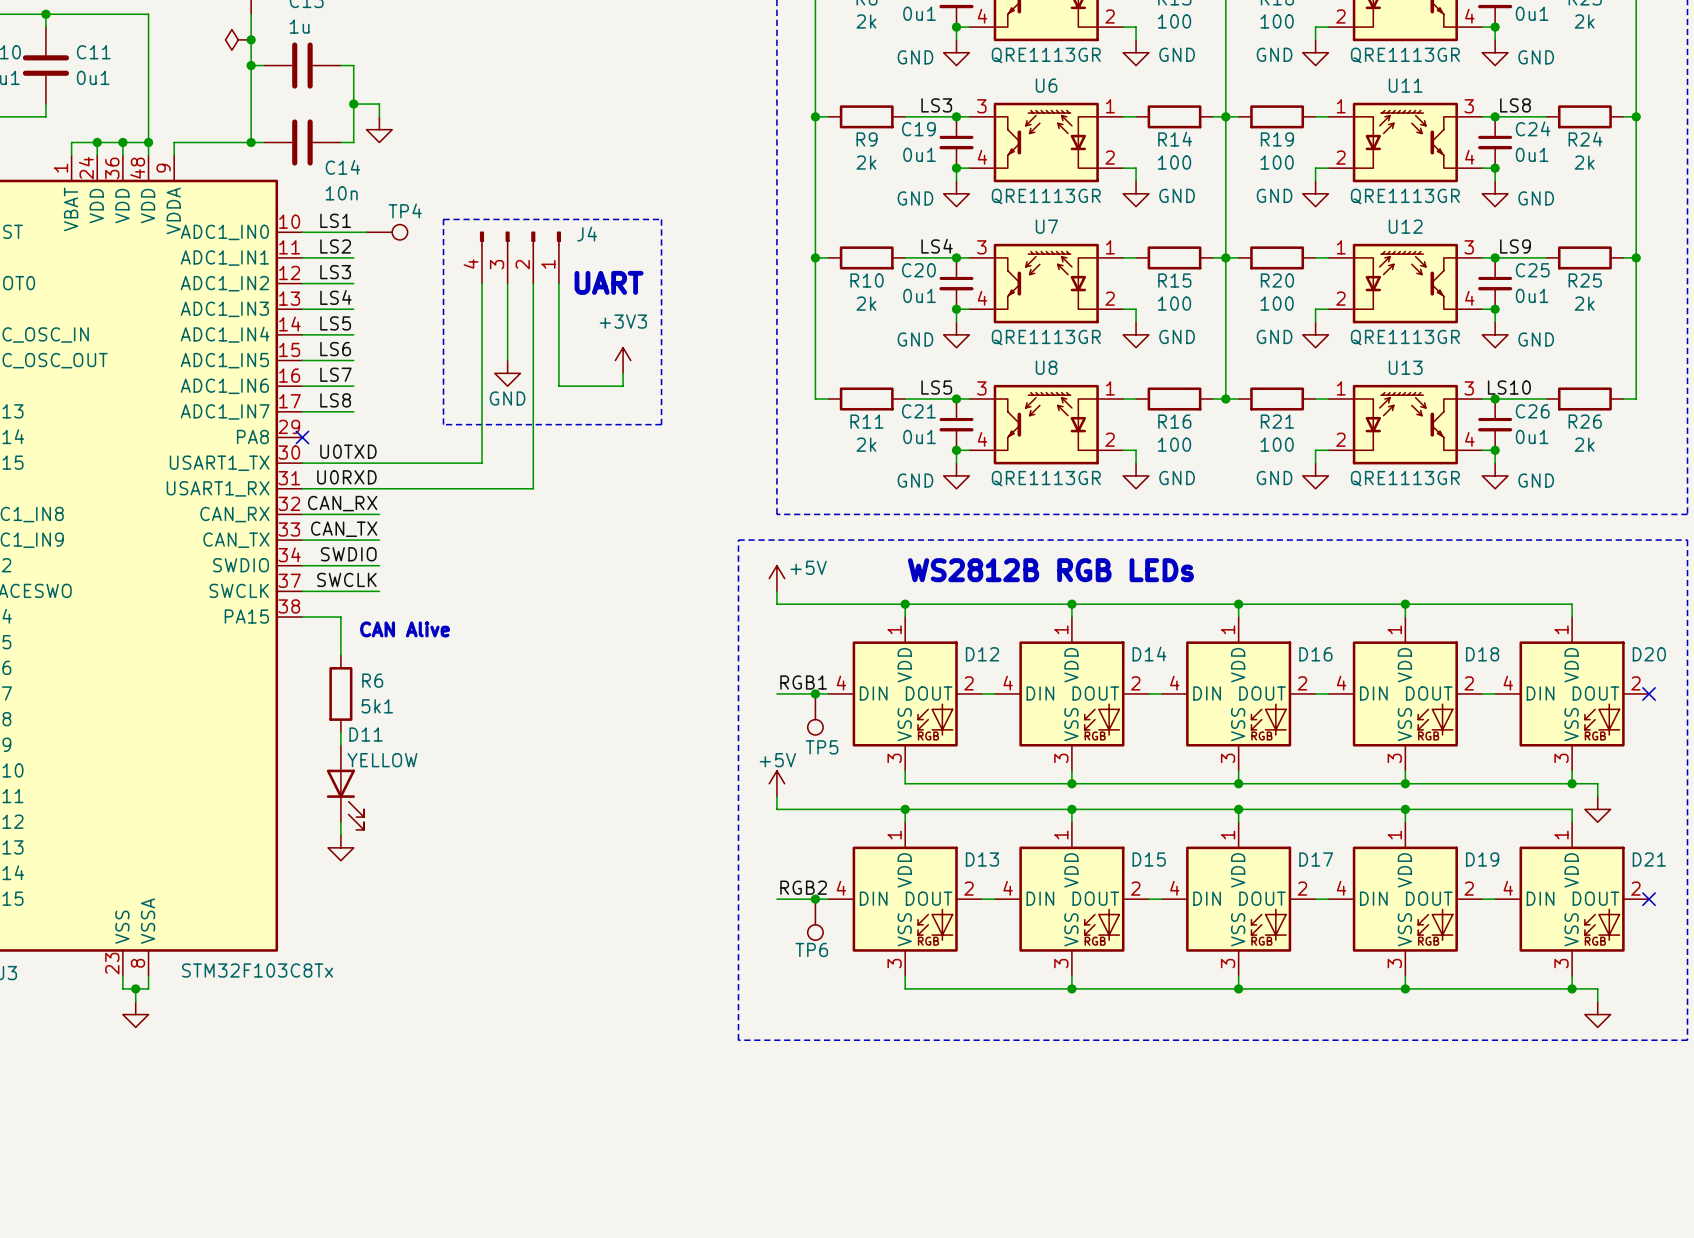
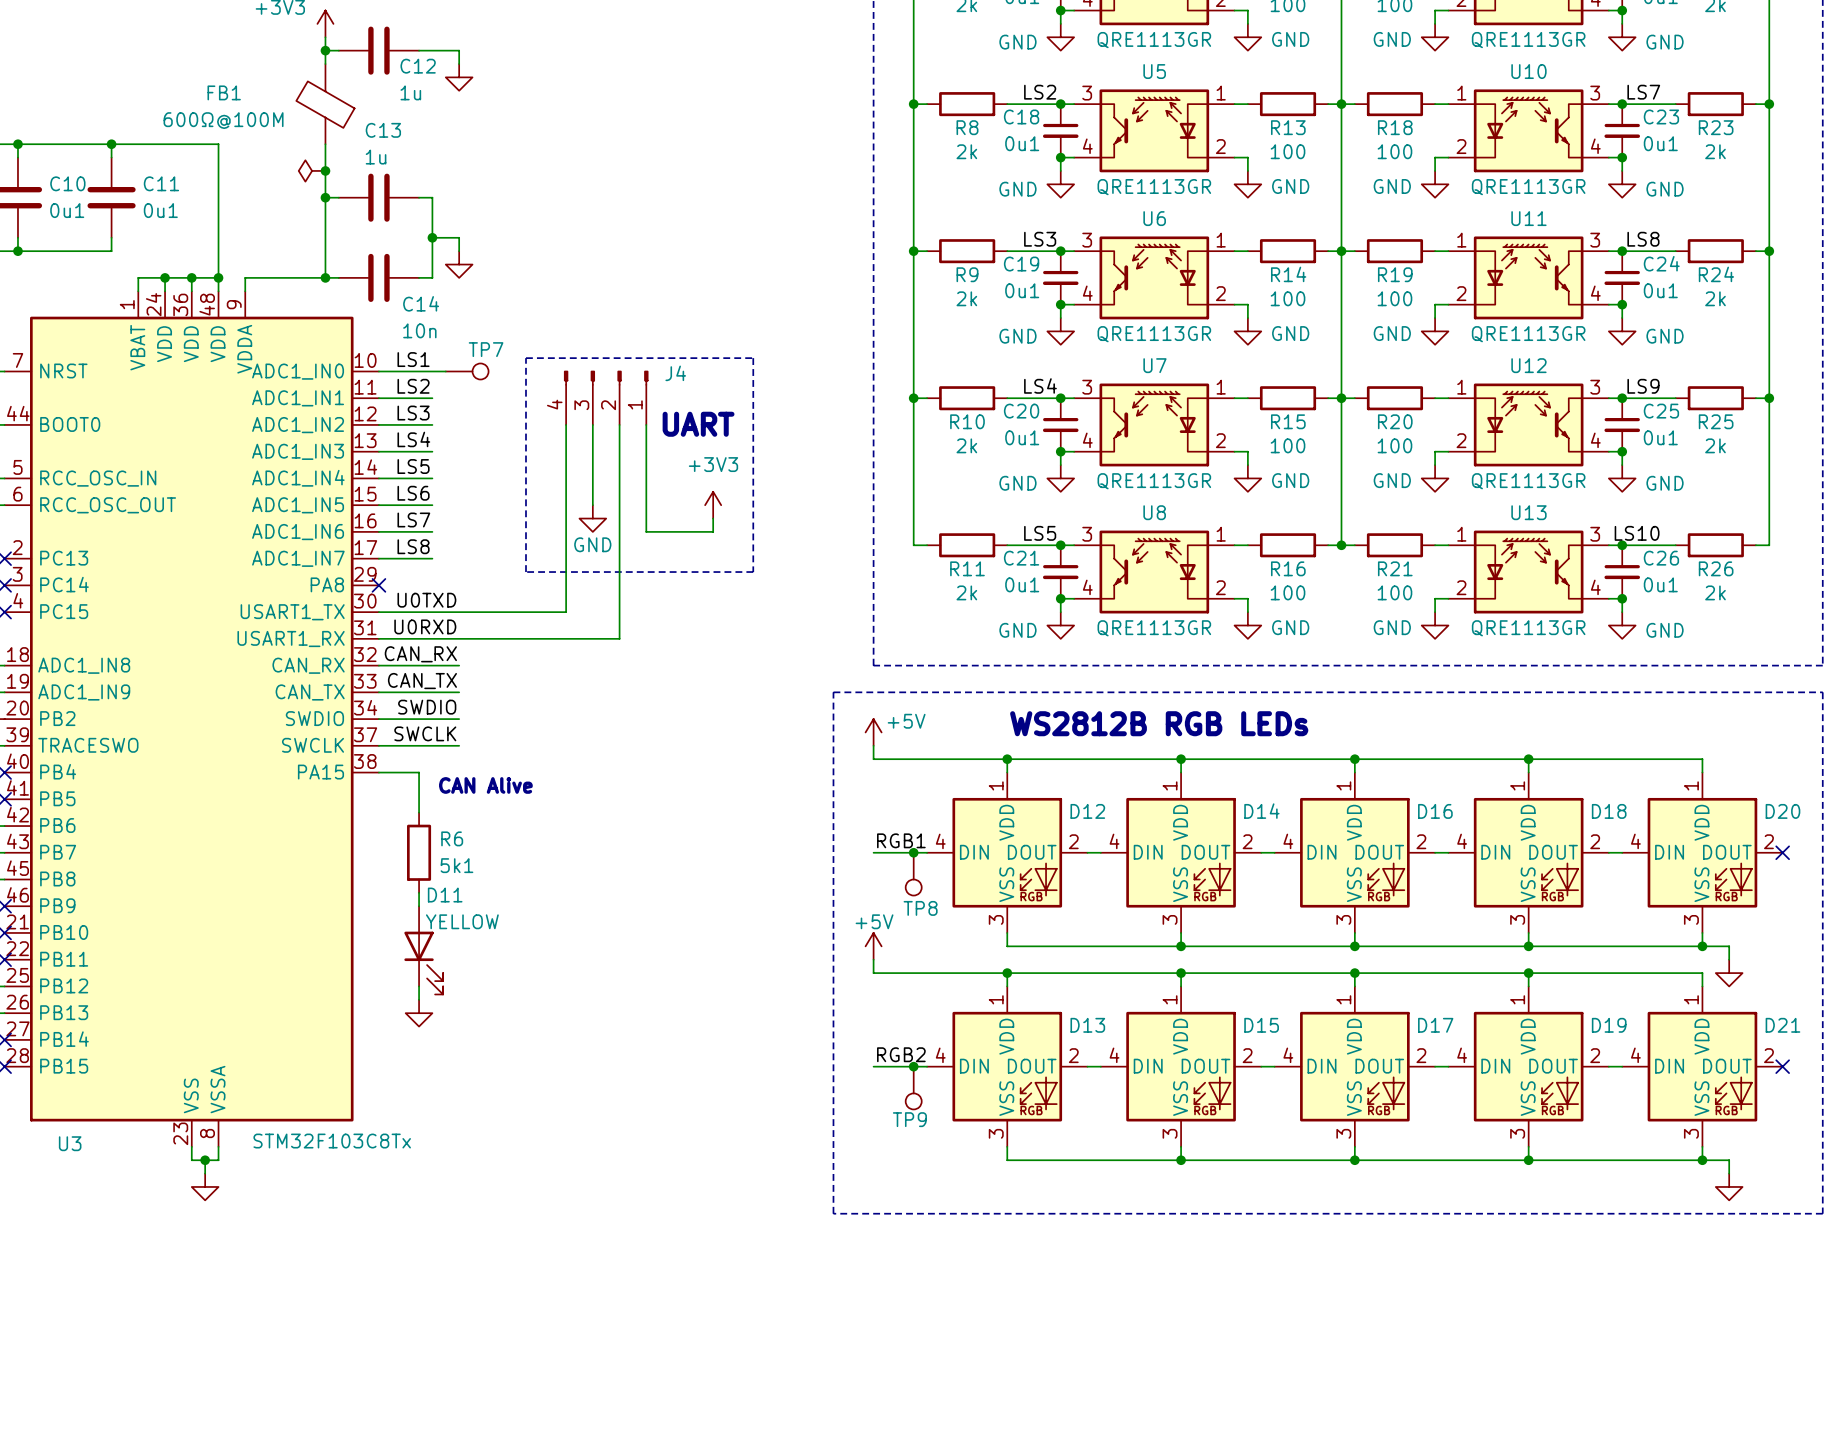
TP4 name: TP4 (405, 210) -> TP7 (486, 349)
TP5 name: TP5 (822, 747) -> TP8 (920, 908)
TP6 name: TP6 (811, 949) -> TP9 (909, 1119)

